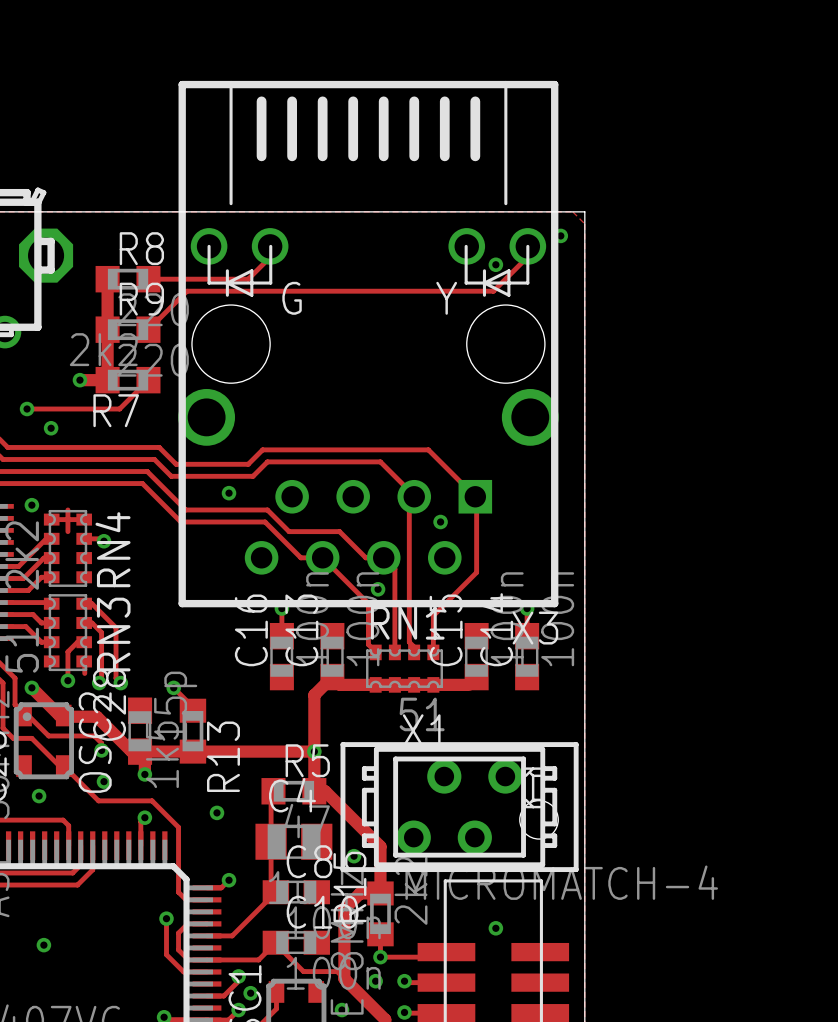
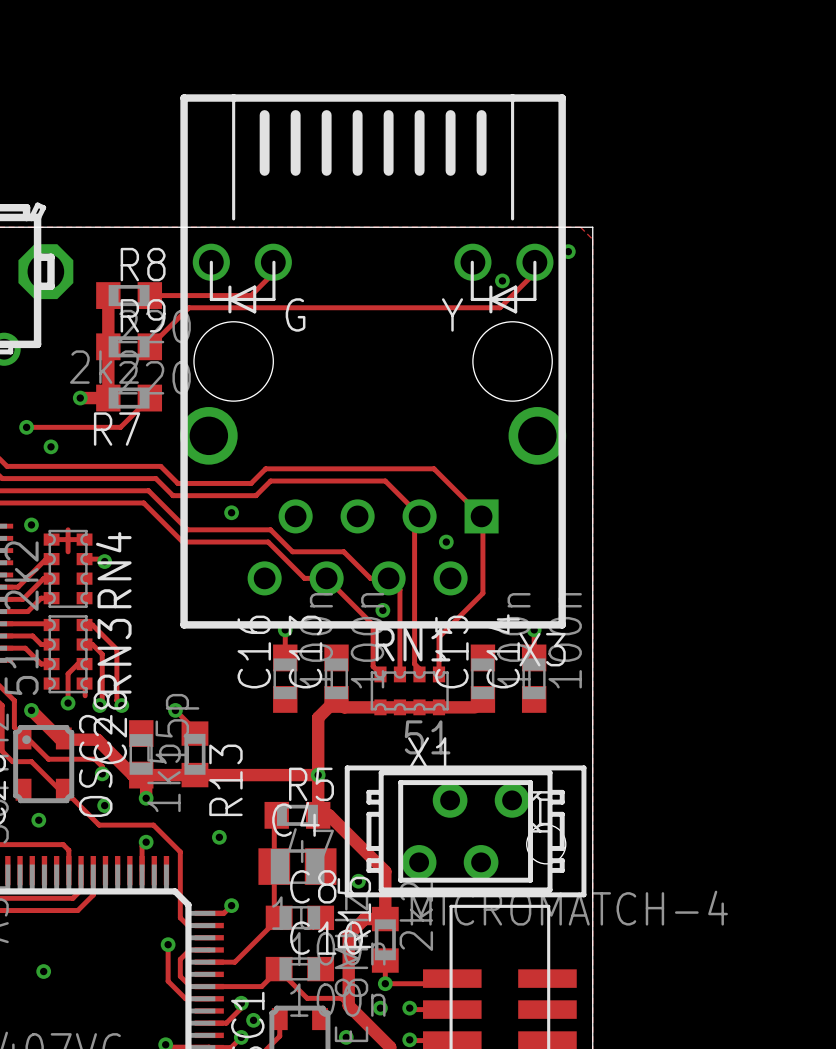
via: (495, 928) -> none

